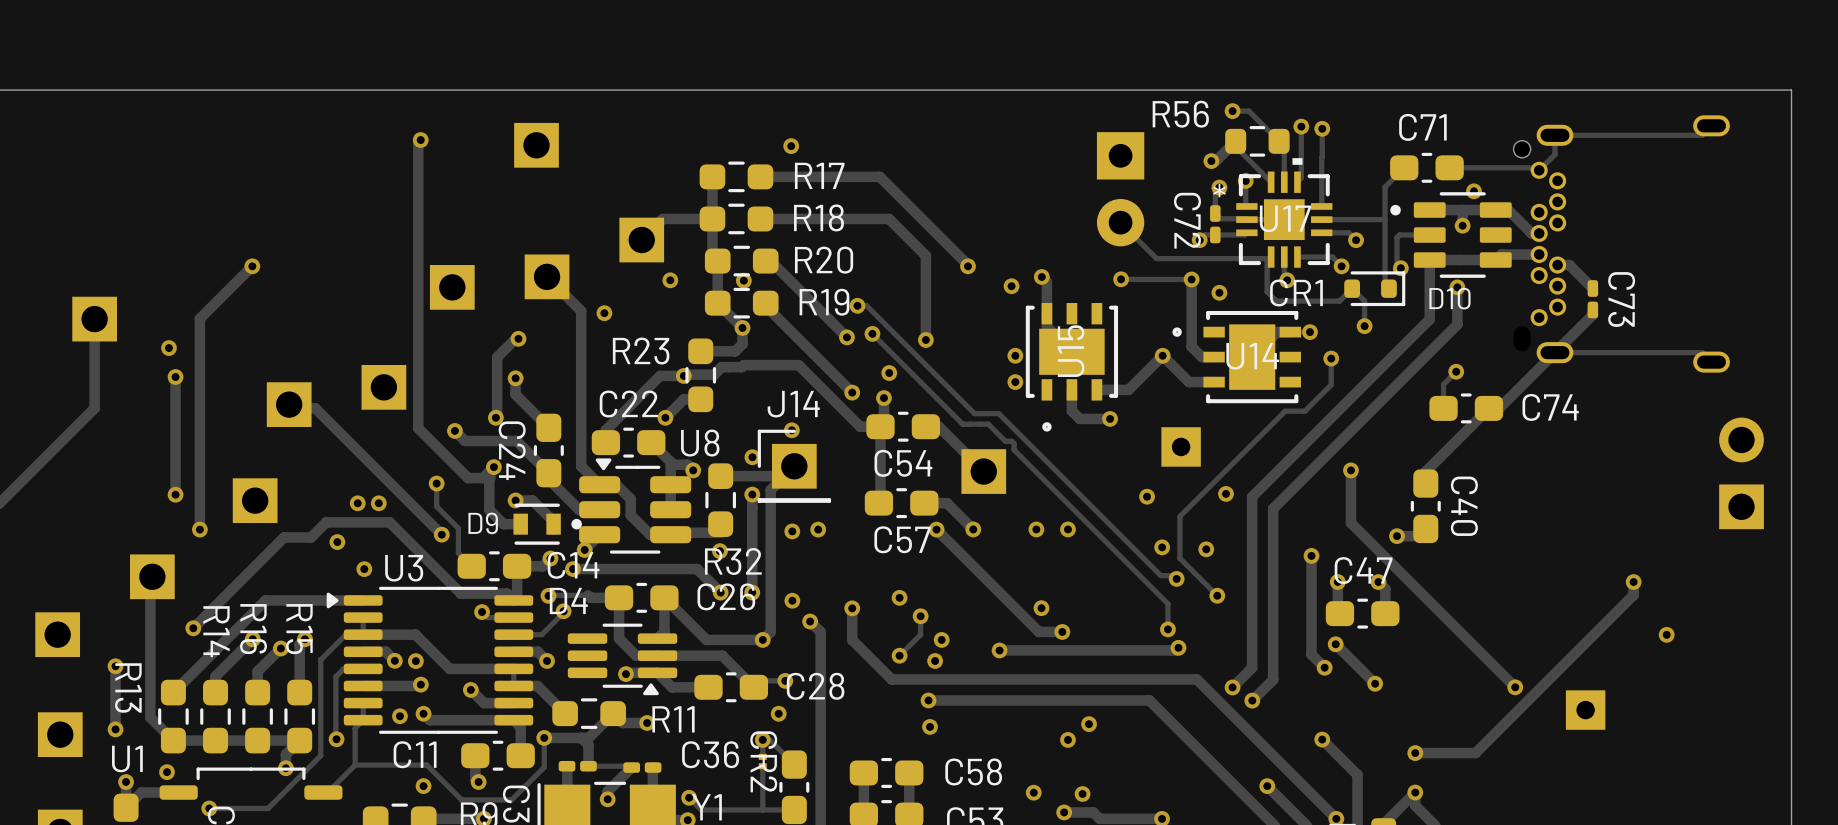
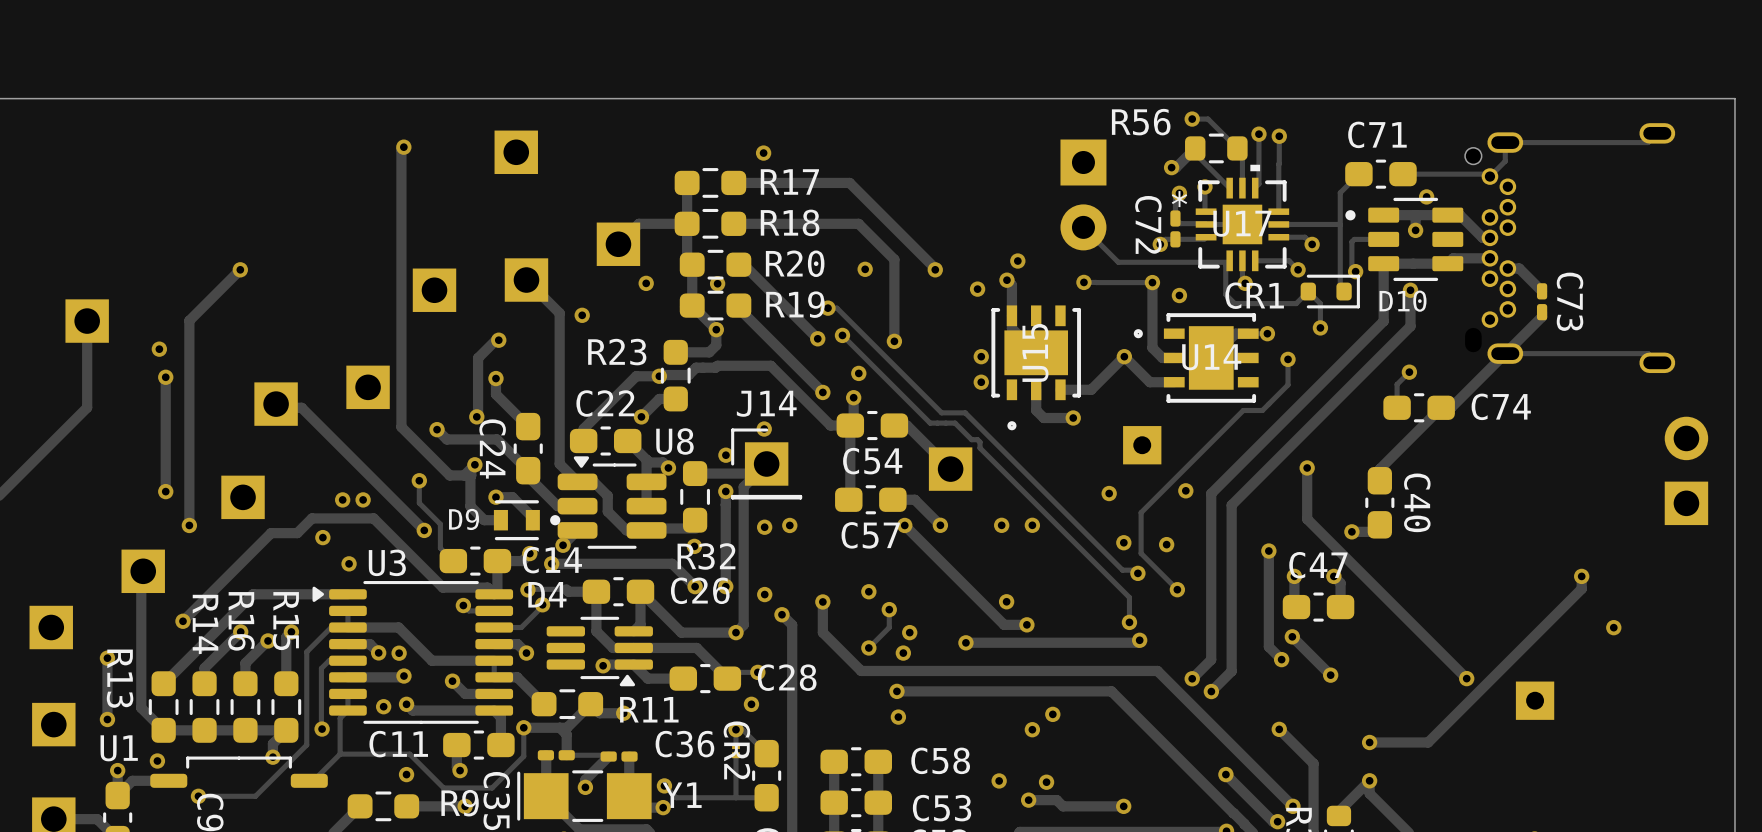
via: none -> (1017, 261)
via: none -> (865, 269)

